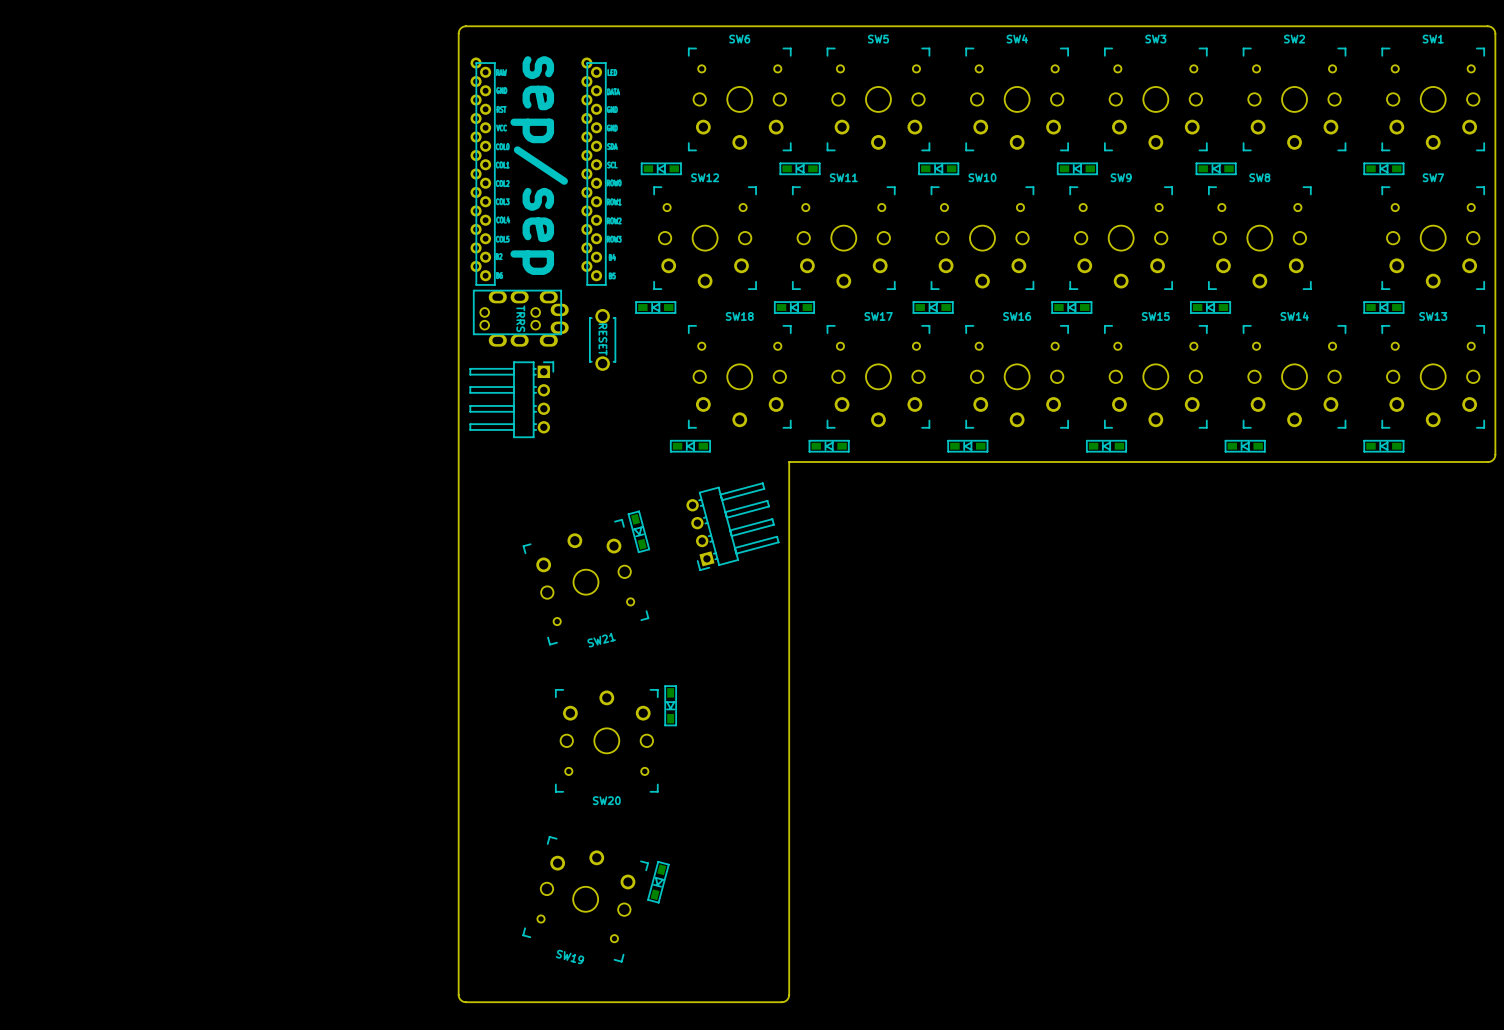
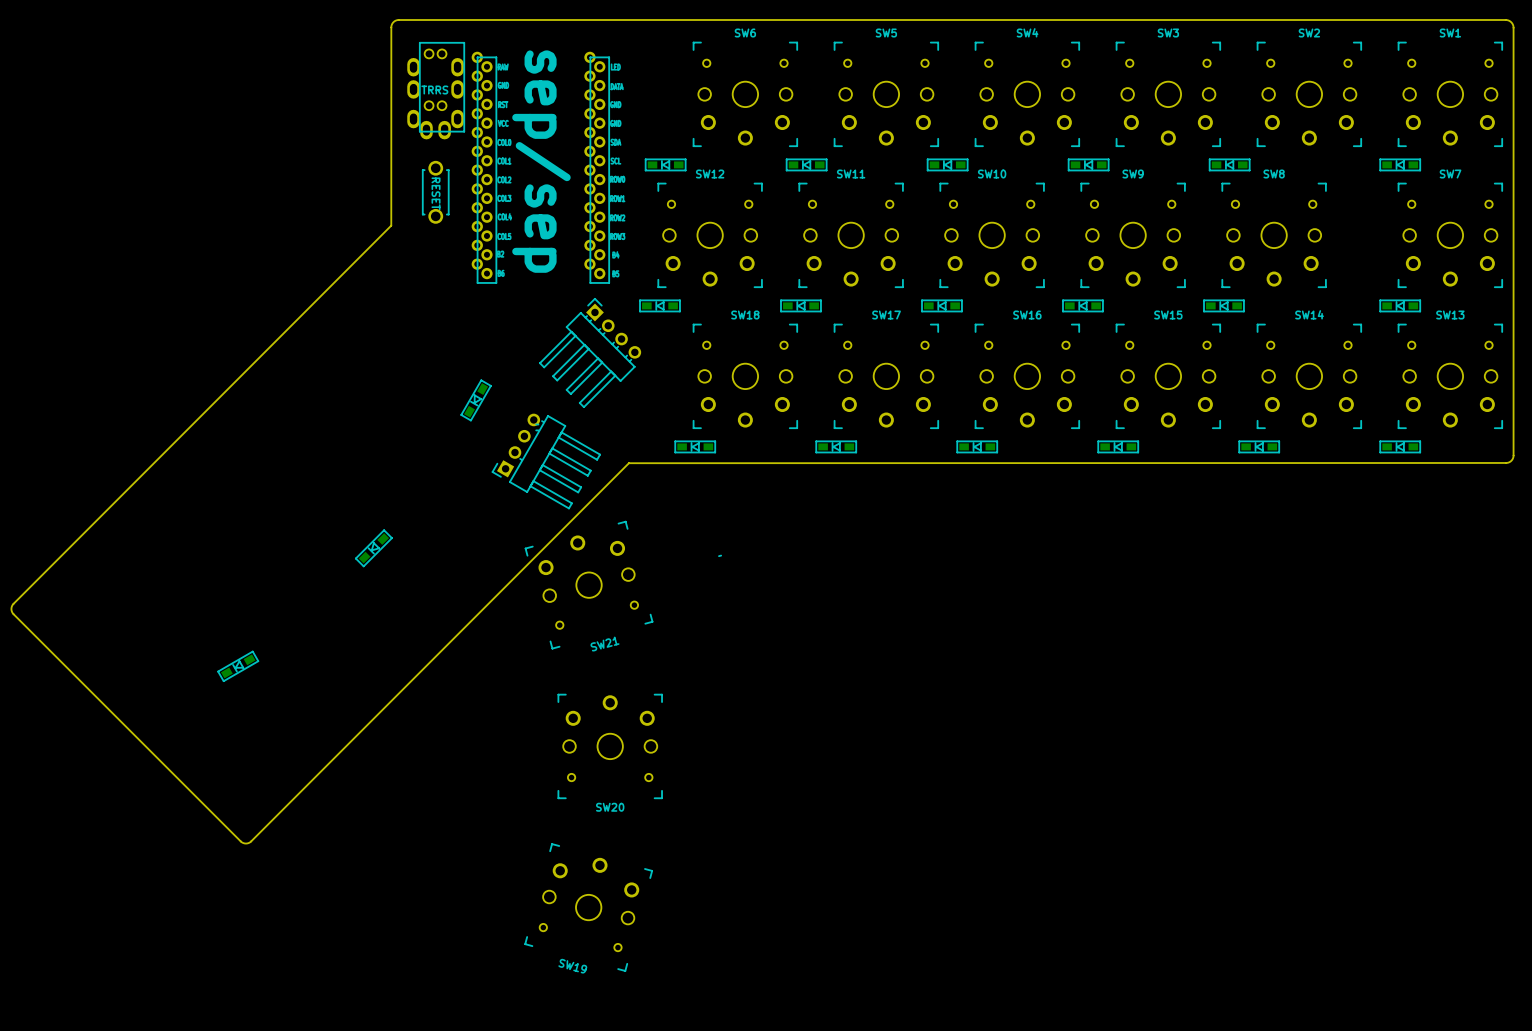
board edge: (465, 26) (460, 28) (458, 33) (458, 994) (462, 1001) (781, 1002) (788, 998) (789, 462) (1488, 462) -> (467, 20) (397, 20) (391, 24) (391, 225) (11, 607) (13, 614) (242, 842) (251, 841) (628, 463) (1506, 462)
part: none -> (436, 90)
part: none -> (435, 192)
line: none -> (601, 305) (594, 298) (588, 305)
line: none -> (580, 312) (566, 327) (620, 380) (634, 366) (580, 312)
line: none -> (587, 316) (585, 317)
part: (521, 318) -> none
line: none -> (591, 320) (589, 321)
line: none -> (600, 328) (598, 330)
line: none -> (571, 331) (539, 363) (544, 367) (575, 335)
part: none -> (613, 331)
line: none -> (604, 333) (603, 334)
part: (602, 339) -> none
line: none -> (614, 342) (612, 344)
line: none -> (584, 344) (553, 376) (557, 380) (588, 349)
line: none -> (618, 346) (616, 348)
line: none -> (627, 355) (625, 357)
line: none -> (598, 358) (566, 389) (570, 394) (602, 362)
line: none -> (631, 359) (629, 361)
line: (533, 362) (513, 362) (513, 437) (533, 437) (533, 362) -> none
line: (543, 362) (553, 362) (553, 371) -> none
line: (513, 368) (470, 368) (470, 374) (513, 374) -> none
line: (535, 368) (533, 368) -> none
line: none -> (611, 371) (579, 402) (583, 407) (615, 375)
line: (535, 374) (533, 374) -> none
line: (513, 387) (470, 387) (470, 392) (513, 392) -> none
line: (536, 387) (534, 387) -> none
line: (536, 392) (534, 392) -> none
part: (543, 399) -> none
part: none -> (476, 400)
line: (513, 405) (470, 405) (470, 411) (513, 411) -> none
line: (536, 405) (534, 405) -> none
line: (536, 411) (534, 411) -> none
line: none -> (547, 415) (565, 425) (527, 492) (509, 482) (547, 415)
line: none -> (542, 421) (543, 422)
line: (513, 424) (470, 424) (470, 429) (513, 429) -> none
line: none -> (561, 432) (600, 454) (597, 459) (558, 437)
part: none -> (518, 445)
line: none -> (552, 448) (590, 470) (587, 475) (549, 453)
line: none -> (520, 458) (522, 460)
line: none -> (497, 463) (492, 472) (500, 476)
line: none -> (542, 465) (581, 487) (578, 492) (539, 470)
line: none -> (533, 481) (571, 503) (568, 508) (530, 486)
line: (718, 487) (699, 492) (719, 565) (738, 559) (718, 487) -> none
line: (720, 494) (762, 483) (764, 488) (722, 500) -> none
line: (701, 499) (699, 500) -> none
line: (702, 505) (700, 505) -> none
line: (725, 512) (767, 500) (769, 506) (726, 517) -> none
line: (705, 517) (703, 517) -> none
line: (707, 522) (705, 523) -> none
line: (730, 530) (772, 519) (773, 524) (731, 536) -> none
part: (638, 531) -> none
part: (700, 532) -> none
line: (710, 535) (708, 536) -> none
line: (712, 541) (710, 541) -> none
part: none -> (373, 548)
line: (734, 548) (777, 536) (778, 542) (736, 553) -> none
line: (717, 558) (715, 559) -> none
line: (697, 561) (700, 570) (709, 567) -> none
part: none -> (238, 666)
part: (670, 705) -> none
part: (658, 882) -> none

